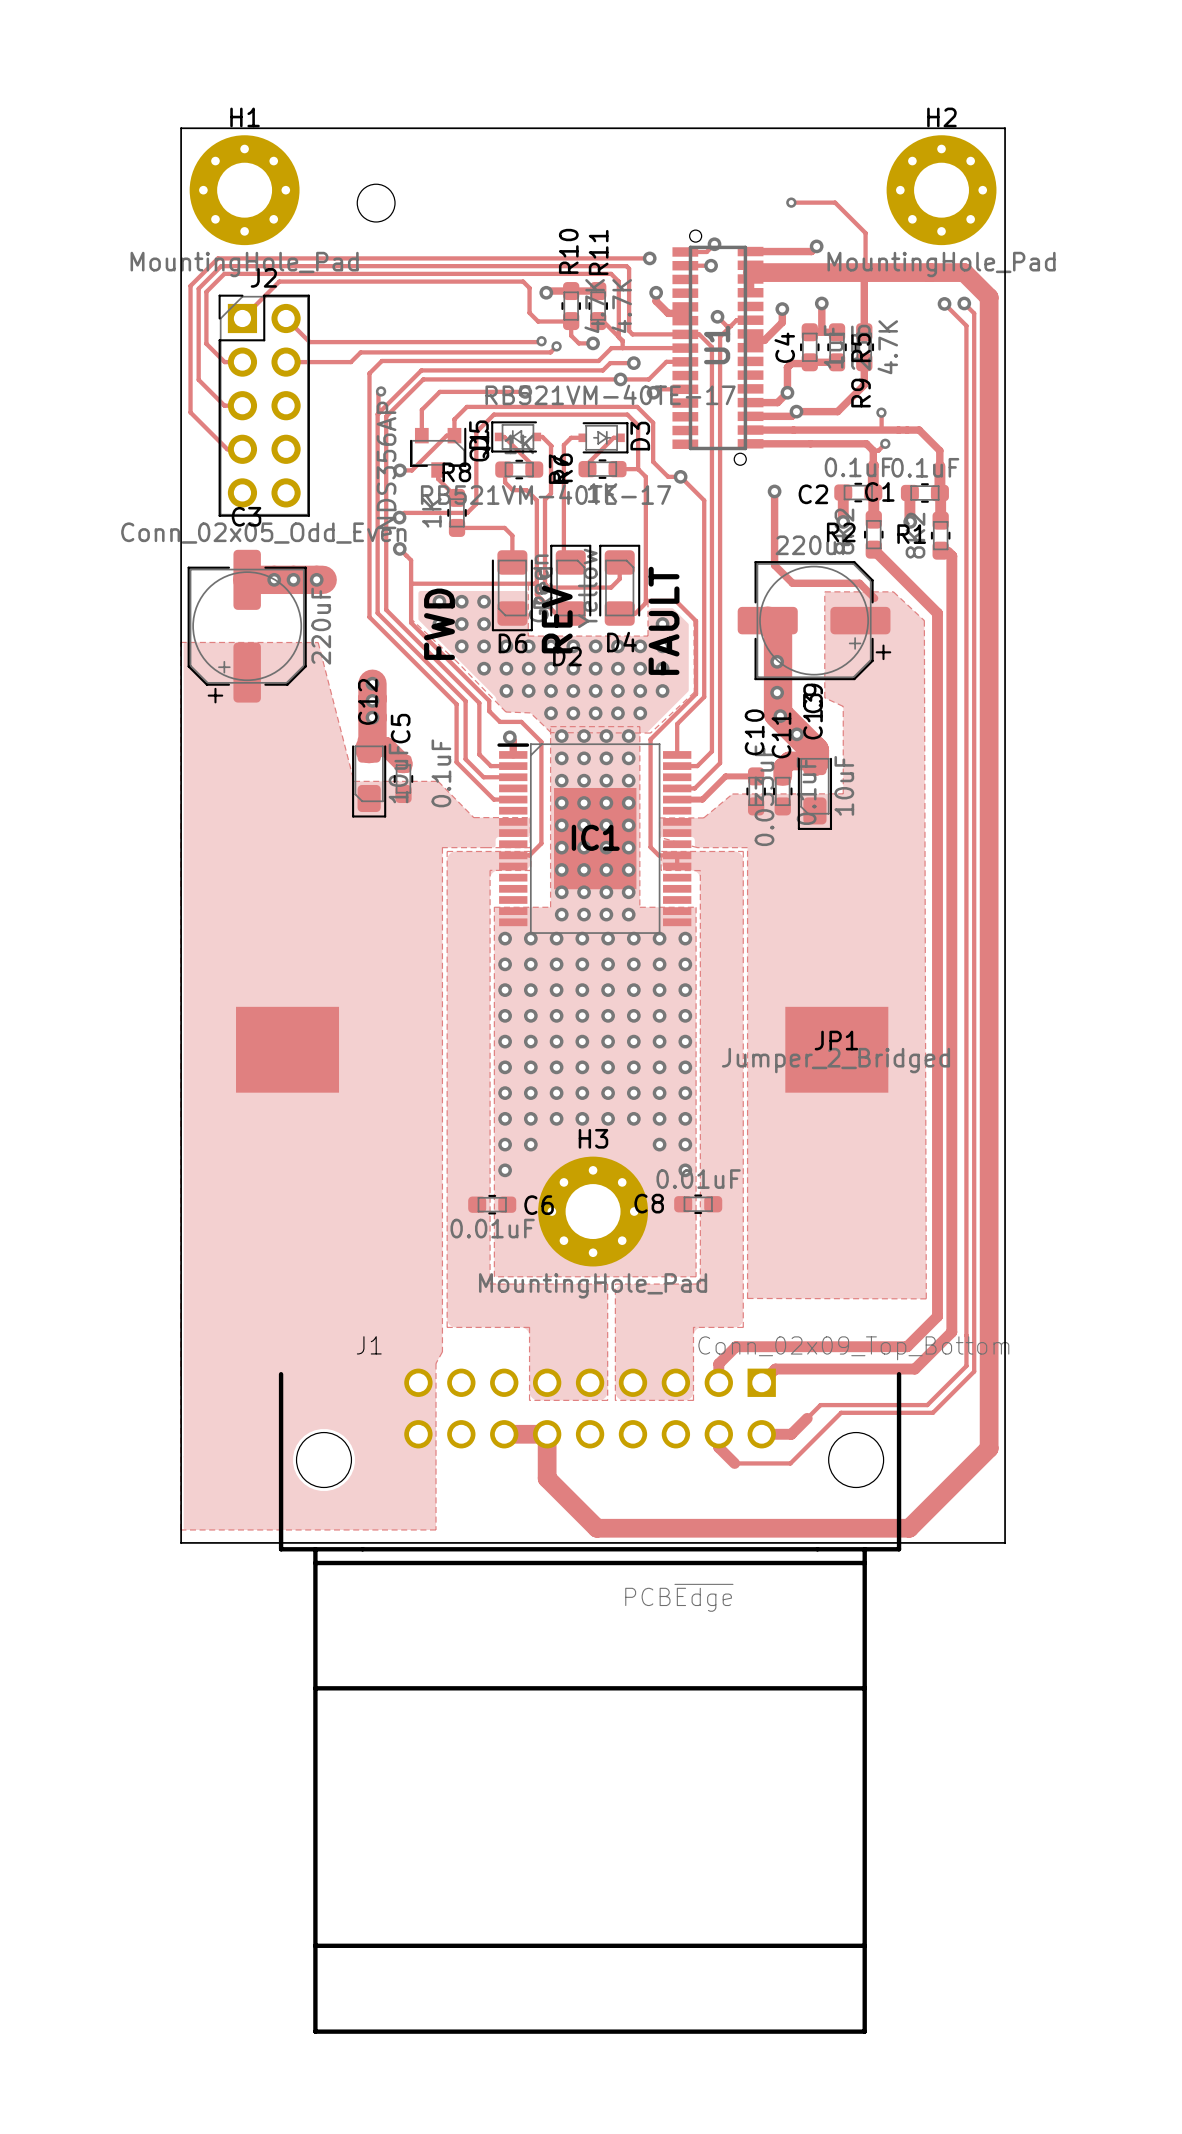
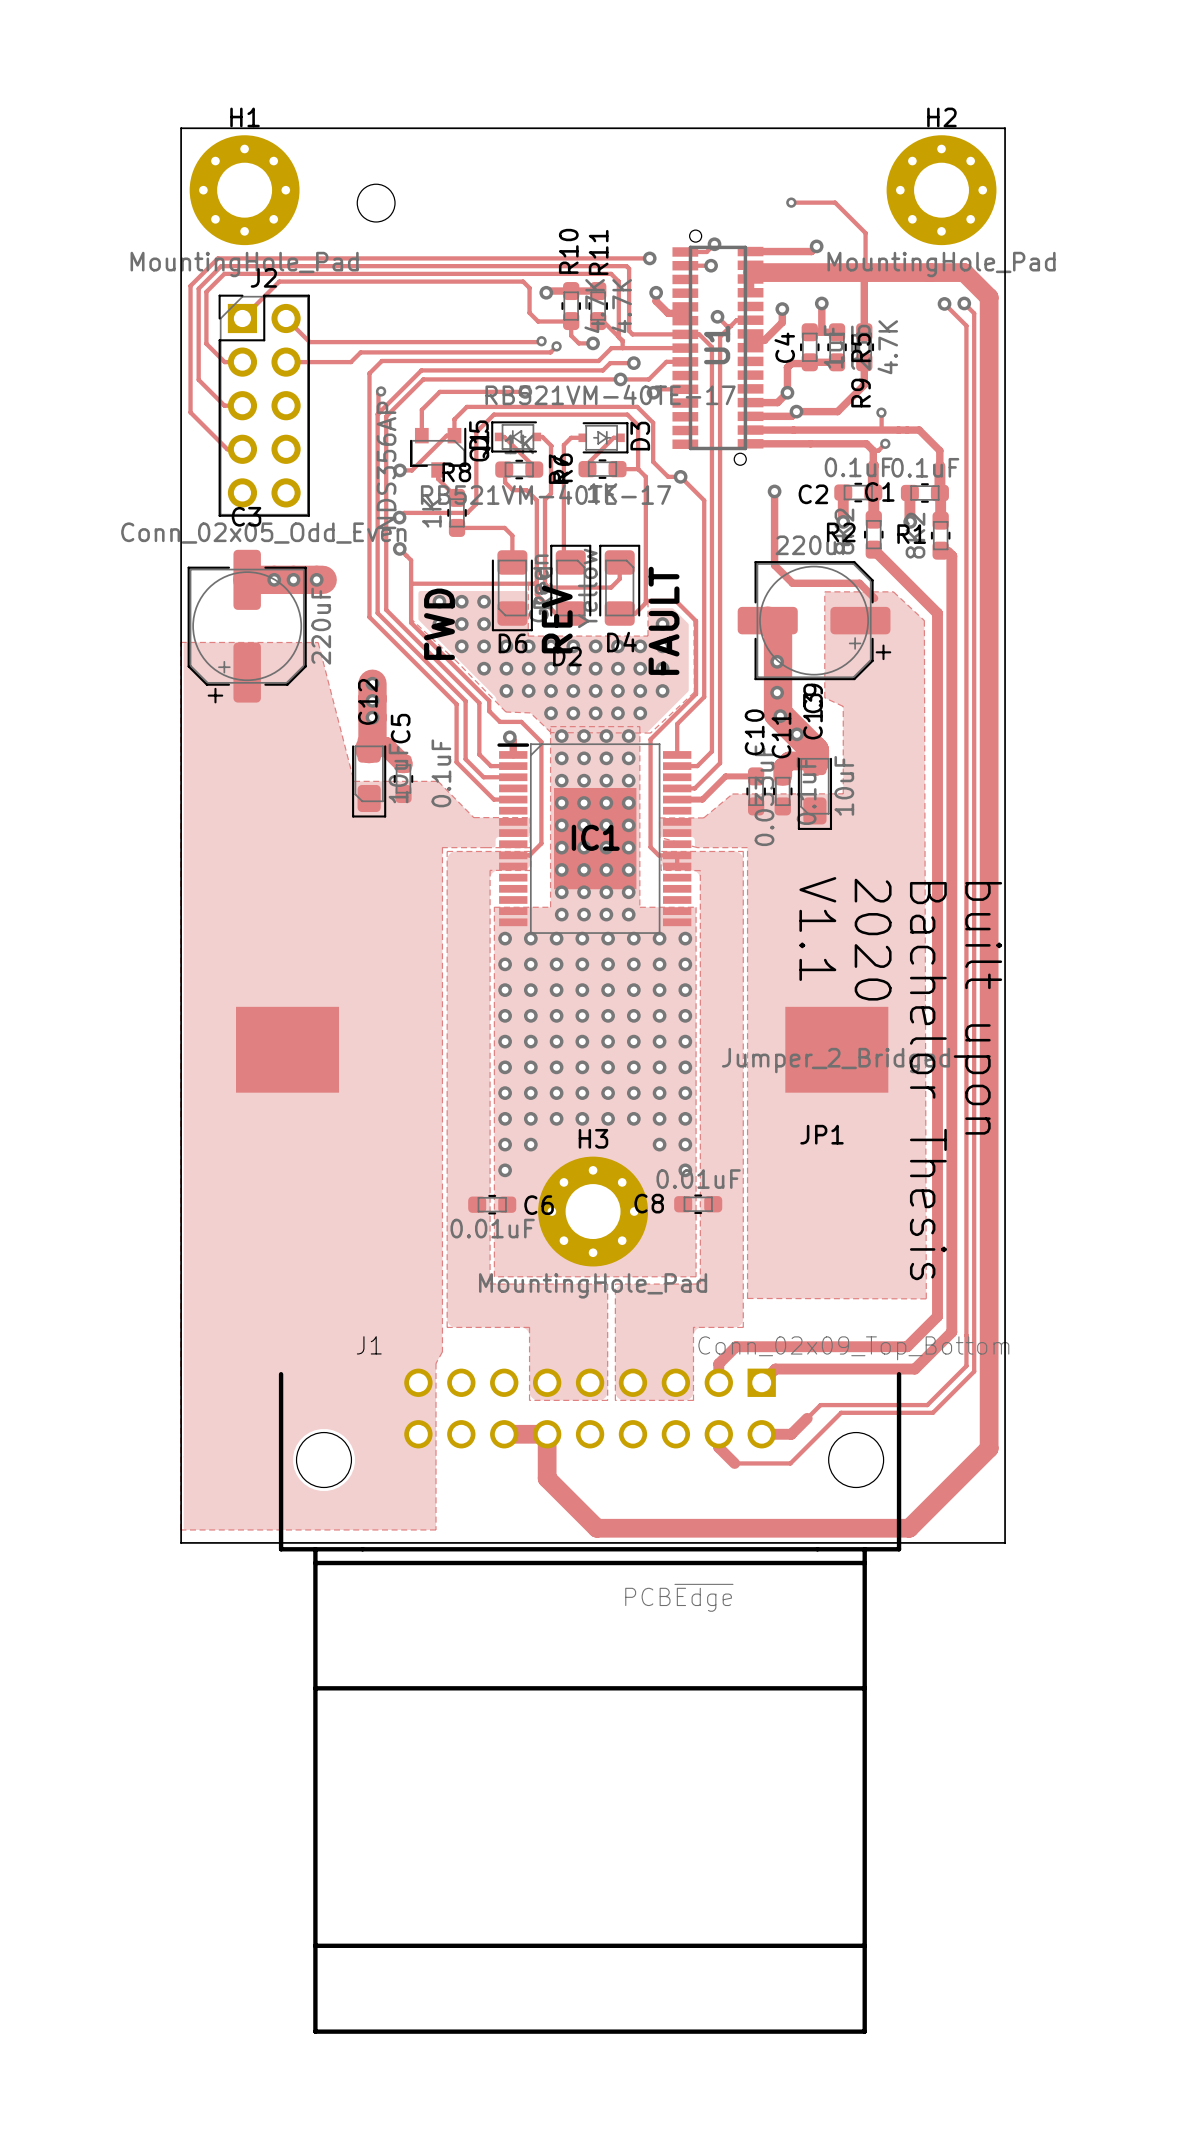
text: none -> V1.1 (817, 929)
text: none -> 2020 (873, 939)
text: none -> built upon (977, 1008)
JP1 name position: JP1 (836, 1040) -> JP1 (821, 1134)
text: none -> Bachelor Thesis (928, 1081)

